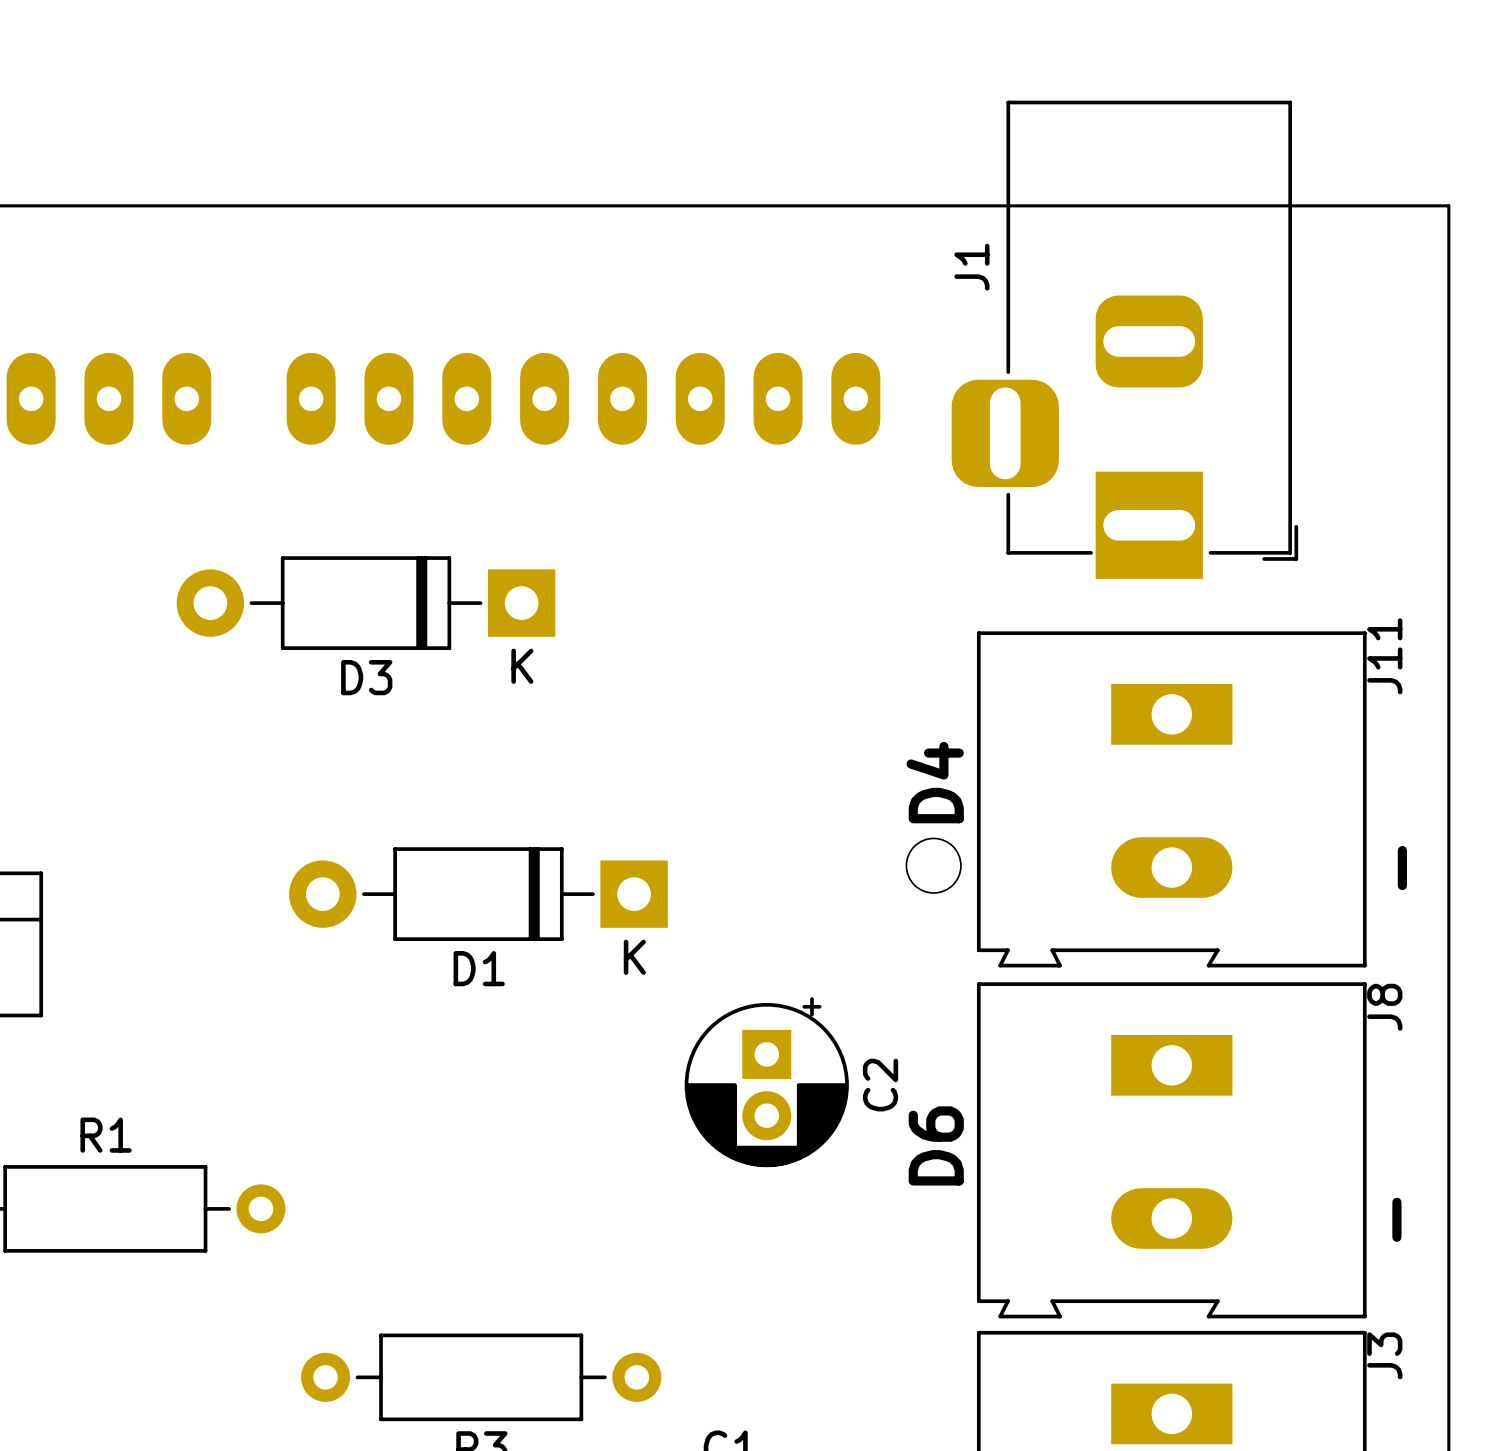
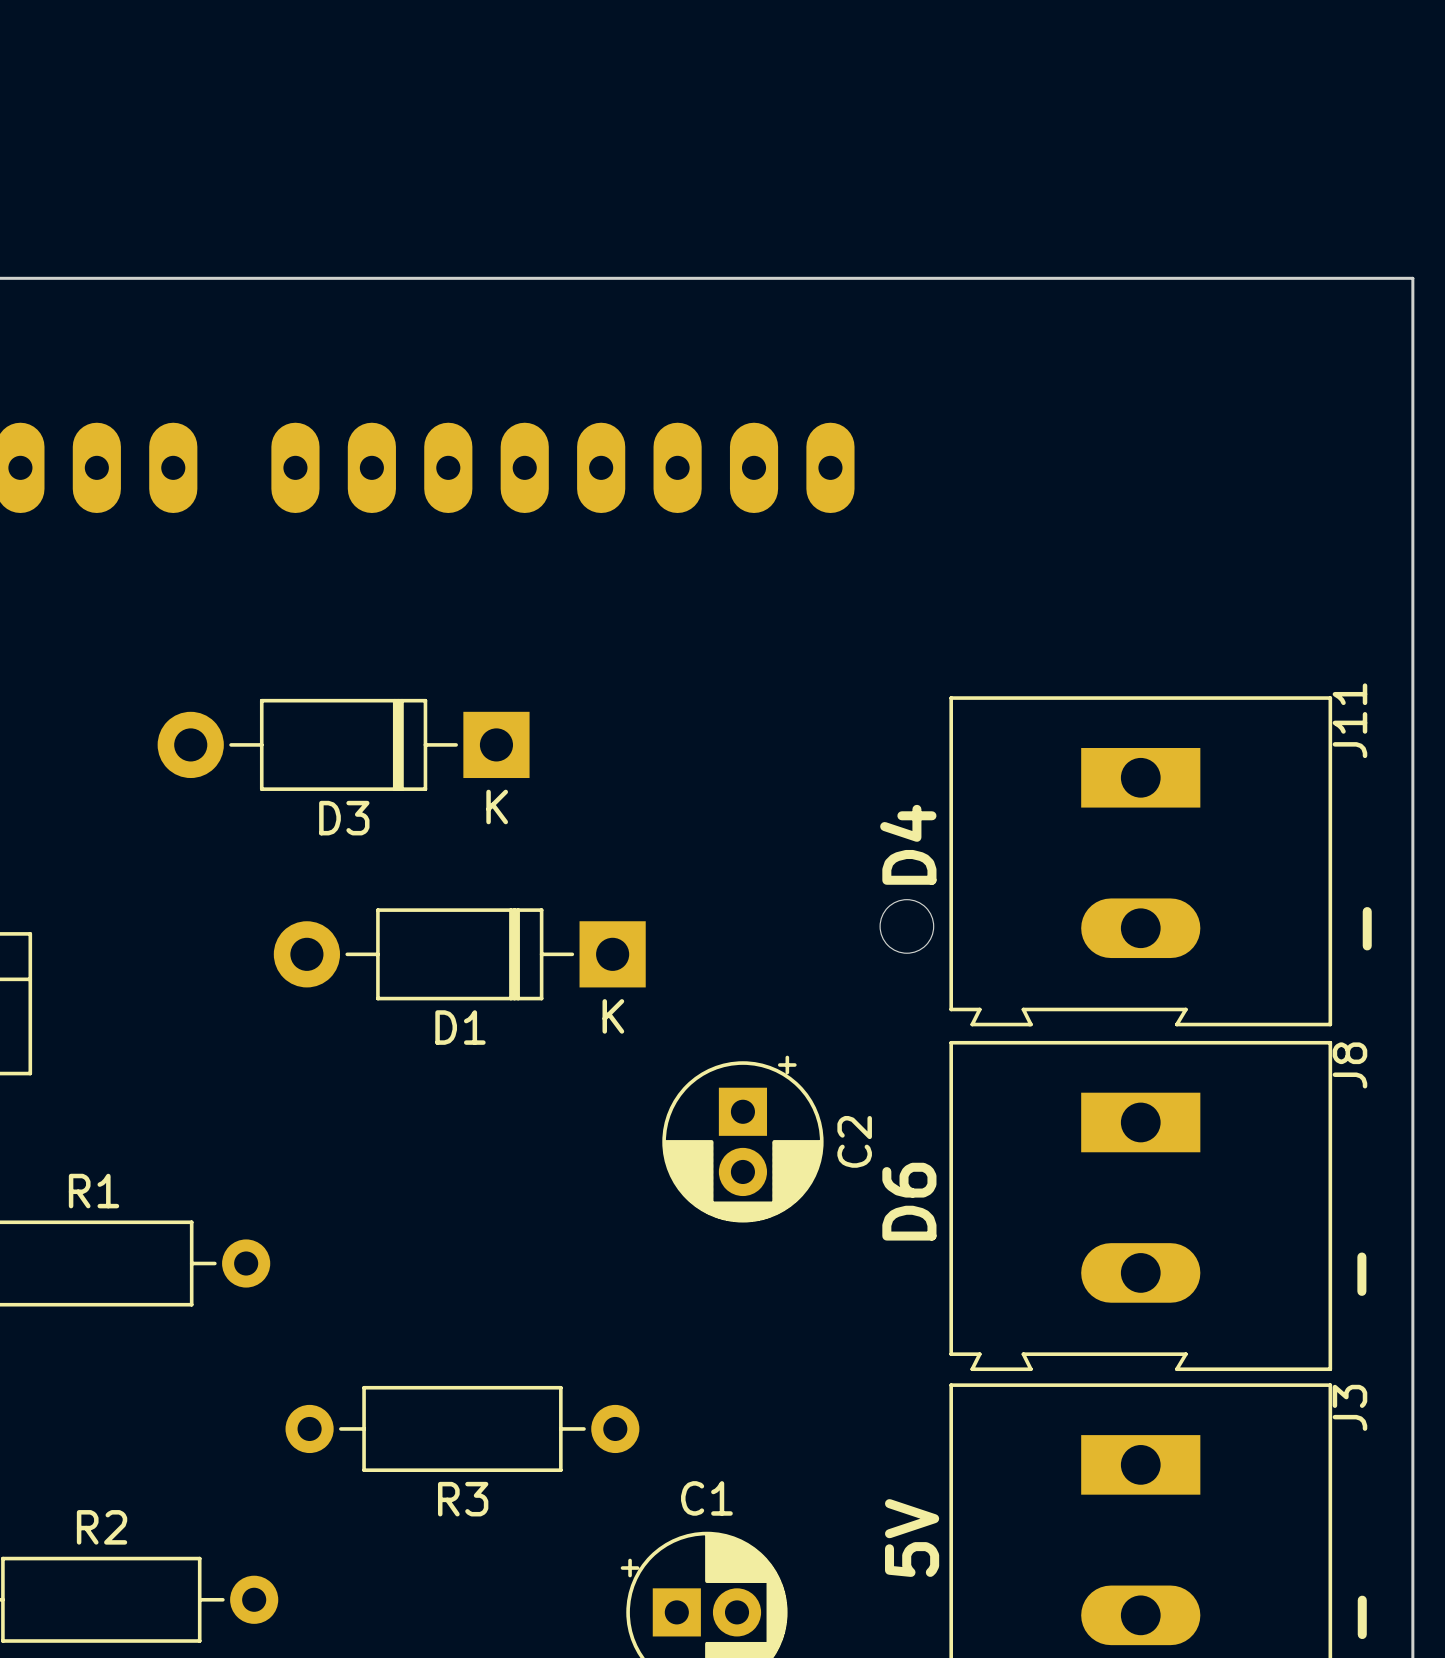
J1: (1124, 339) -> none
D3 position: (366, 603) -> (343, 744)

